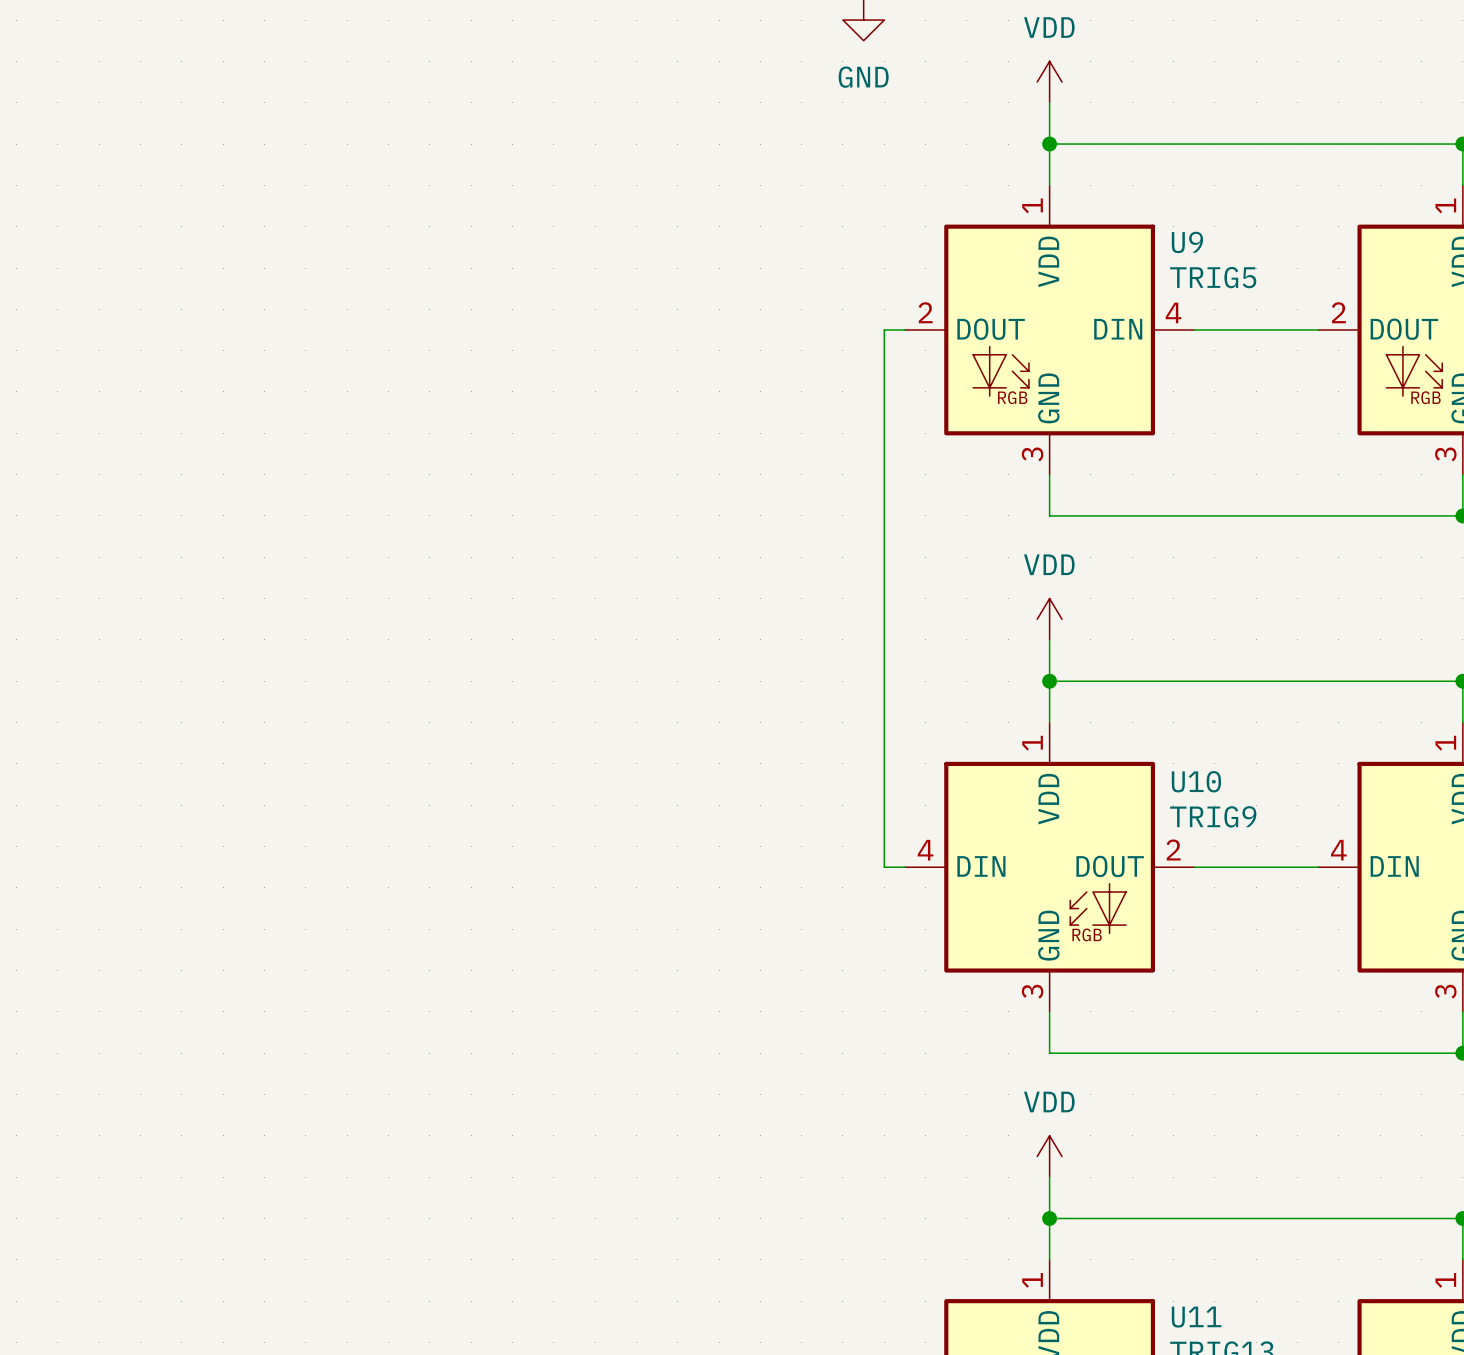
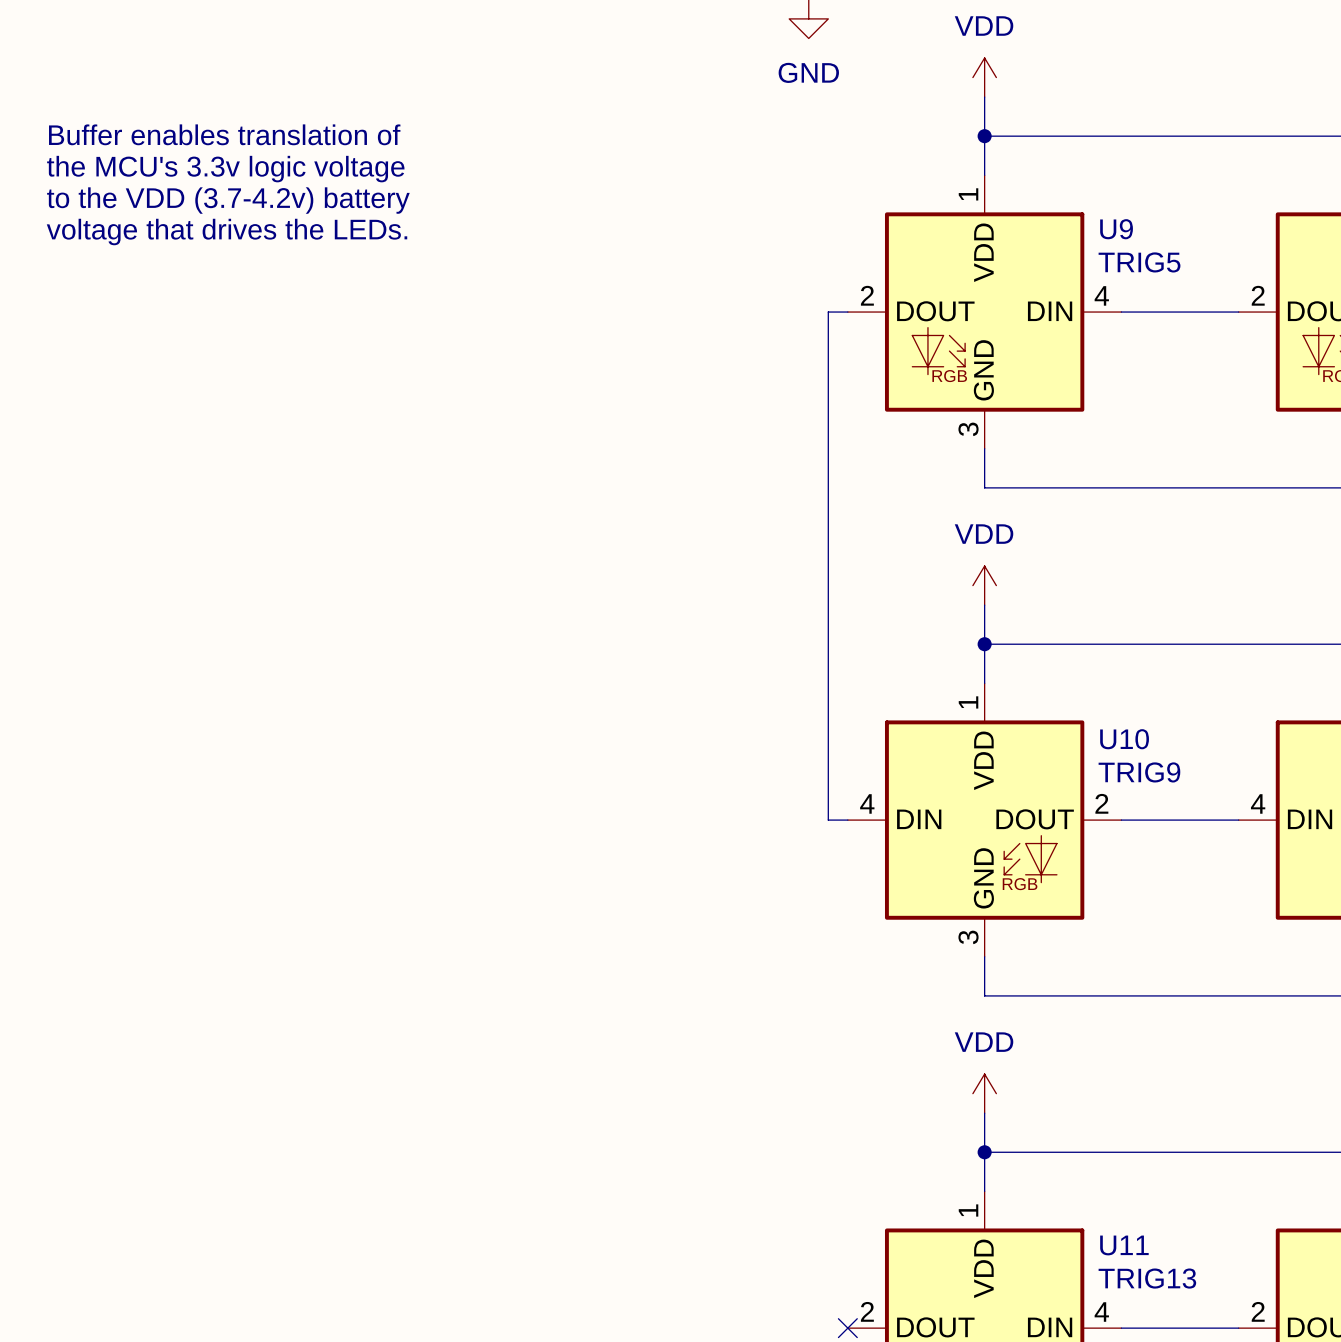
text: none -> Buffer enables translation of (224, 134)
text: none -> the MCU's 3.3v logic voltage (225, 169)
text: none -> to the VDD (3.7-4.2v) battery (228, 200)
text: none -> voltage that drives the LEDs. (227, 232)

